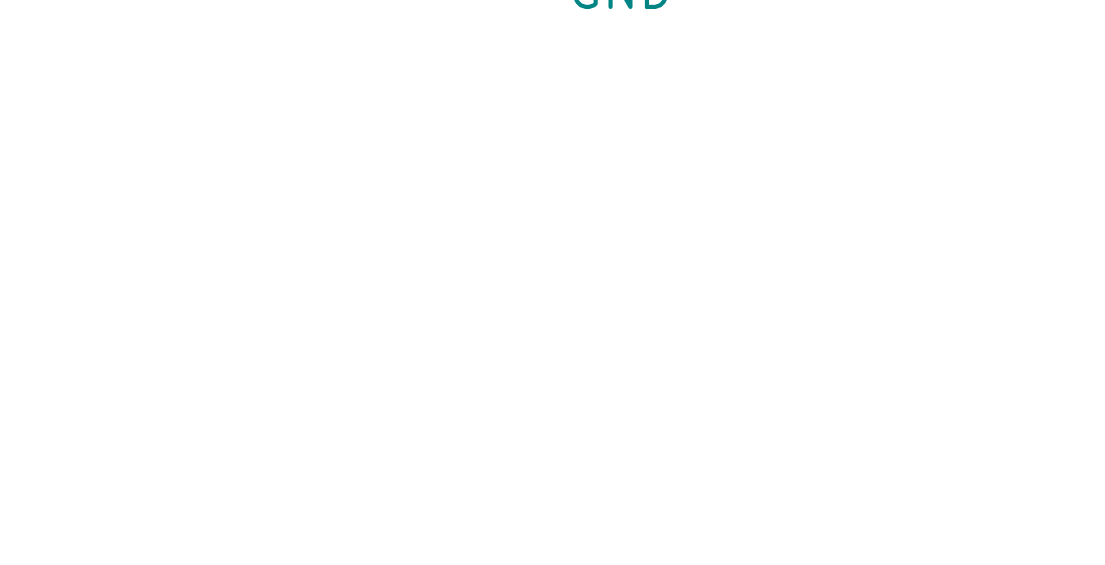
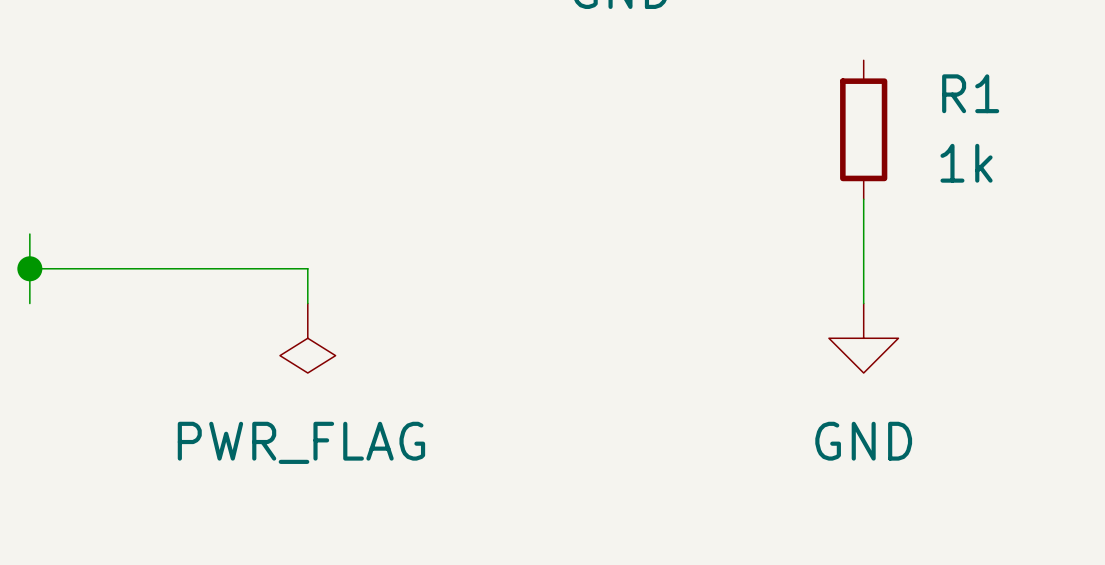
R1: none -> 1k (863, 129)
wire: none -> (863, 199) (863, 303)
wire: none -> (29, 234) (29, 303)
wire: none -> (29, 268) (307, 268) (307, 303)
junction: none -> (29, 268)
power symbol: none -> PWR_FLAG (307, 338)
power symbol: none -> GND (863, 338)

